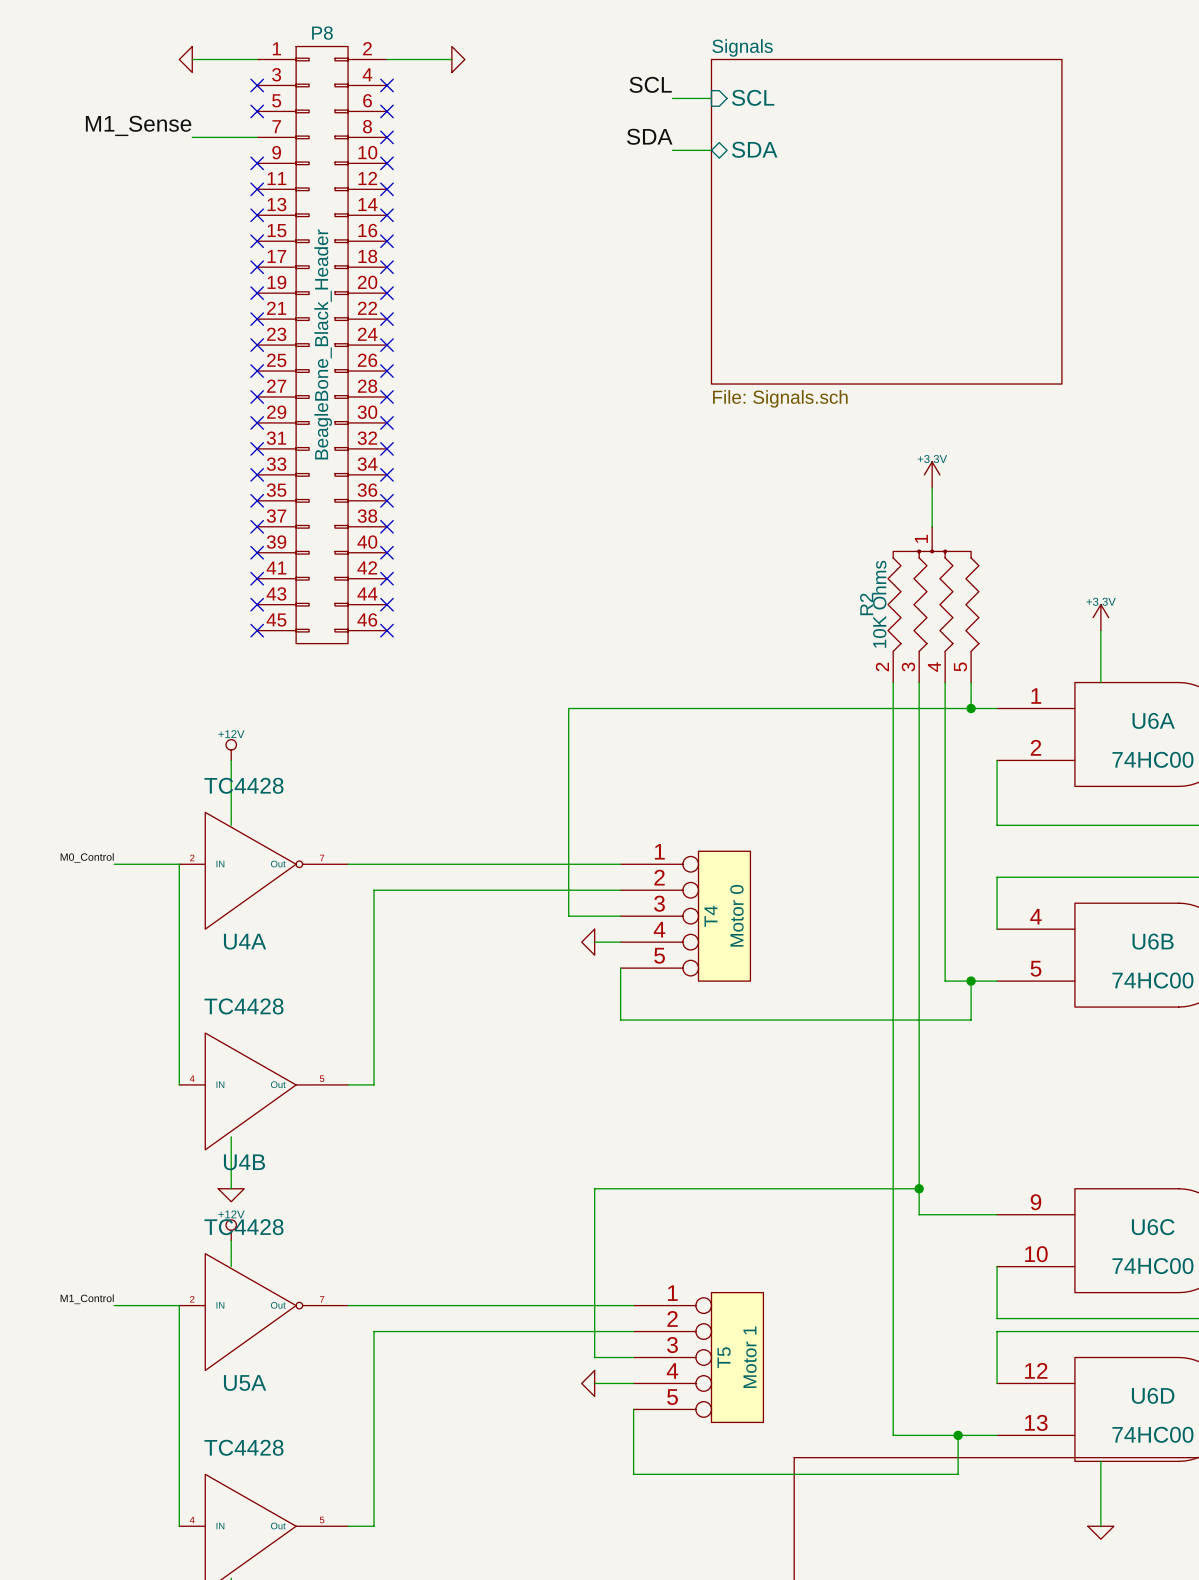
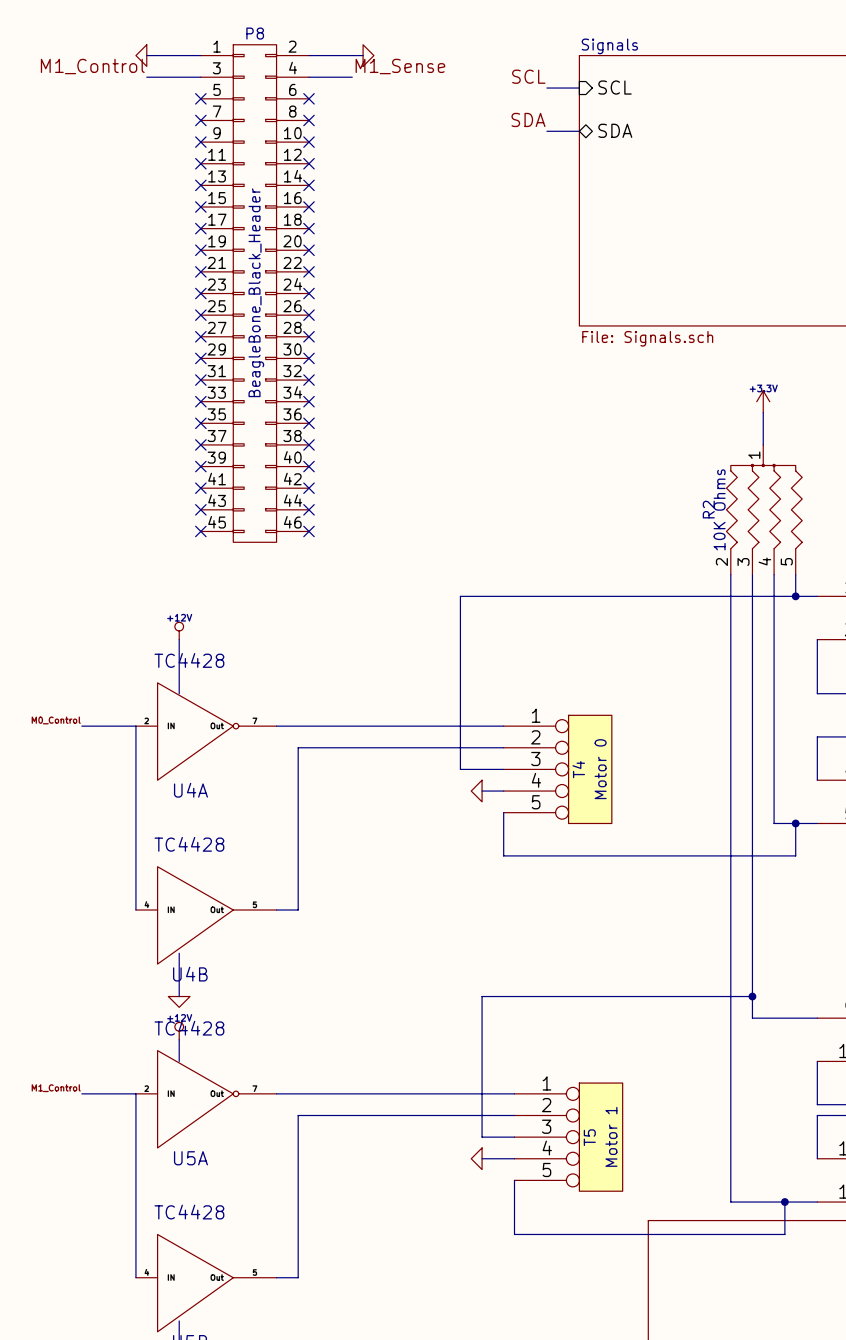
label: none -> M1_Control (92, 66)
no-connect mark position: (257, 85) -> (200, 120)
wire: none -> (309, 77) (352, 77)
no-connect mark: (386, 85) -> none
label position: M1_Sense (138, 125) -> M1_Sense (400, 66)
wire: (192, 137) (257, 137) -> (146, 77) (200, 77)

